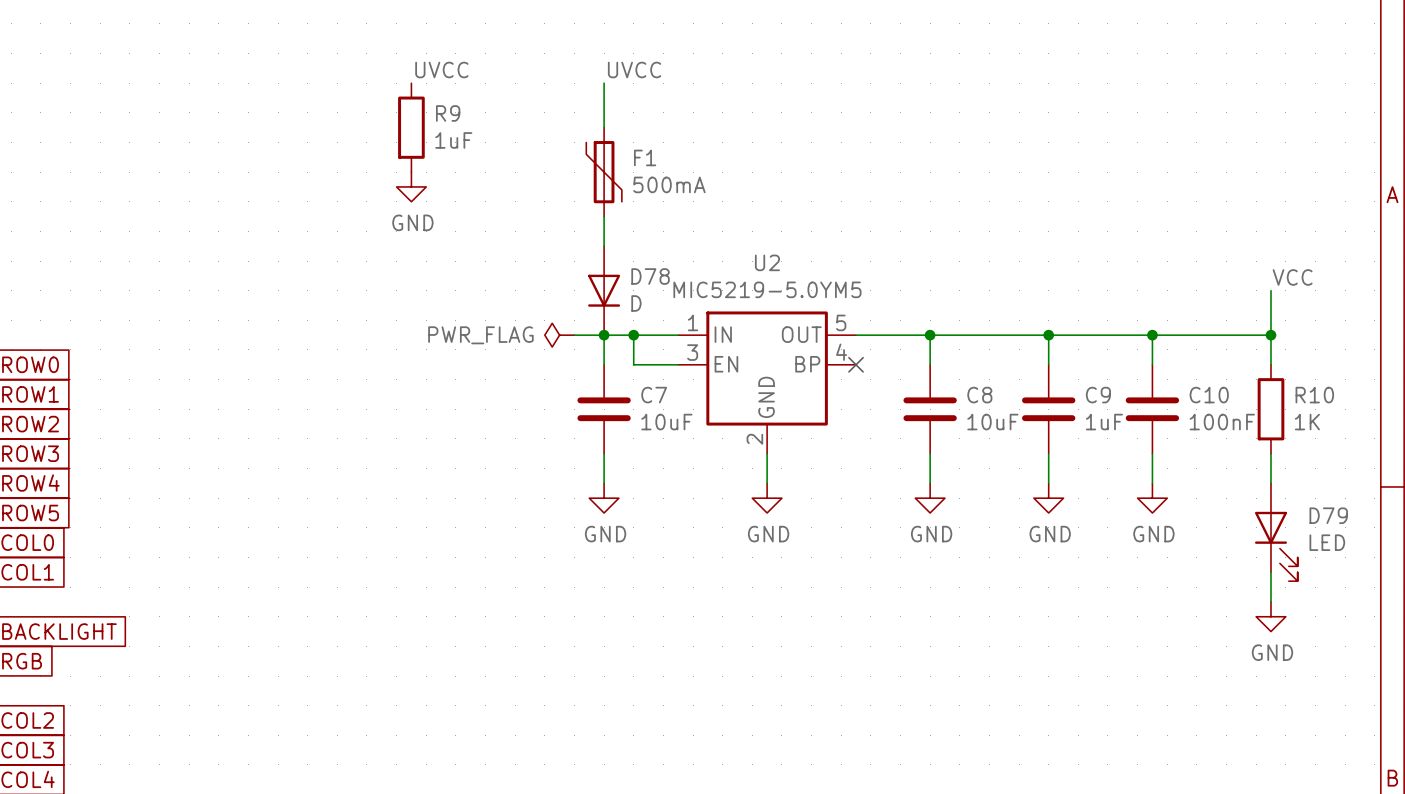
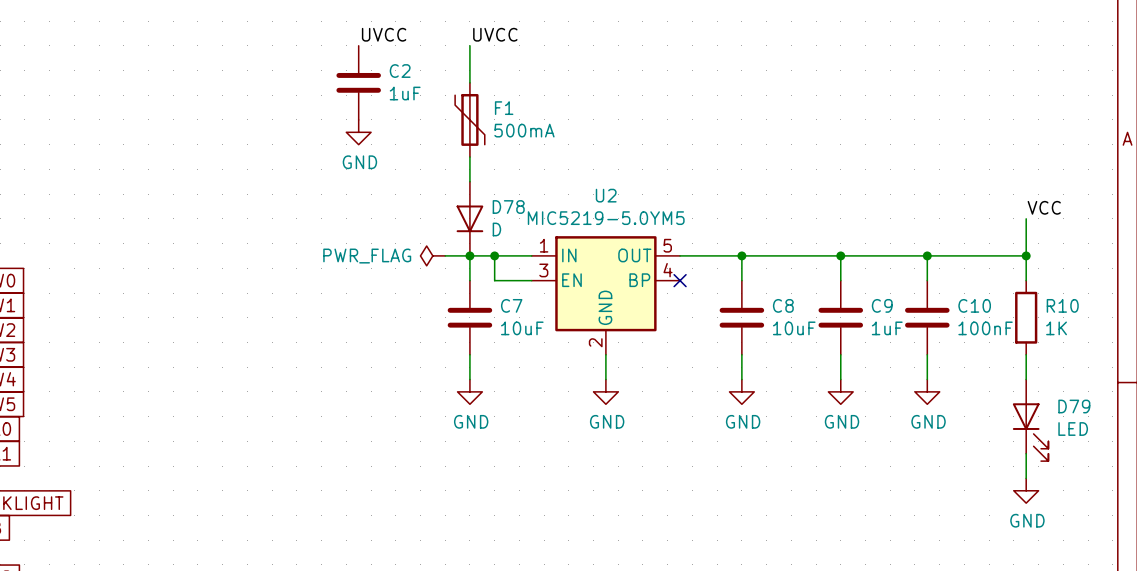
label position: UVCC (441, 69) -> UVCC (384, 34)
R9: 1uF (411, 127) -> none
C2: none -> 1uF (358, 82)
power symbol position: GND (411, 186) -> GND (358, 132)

